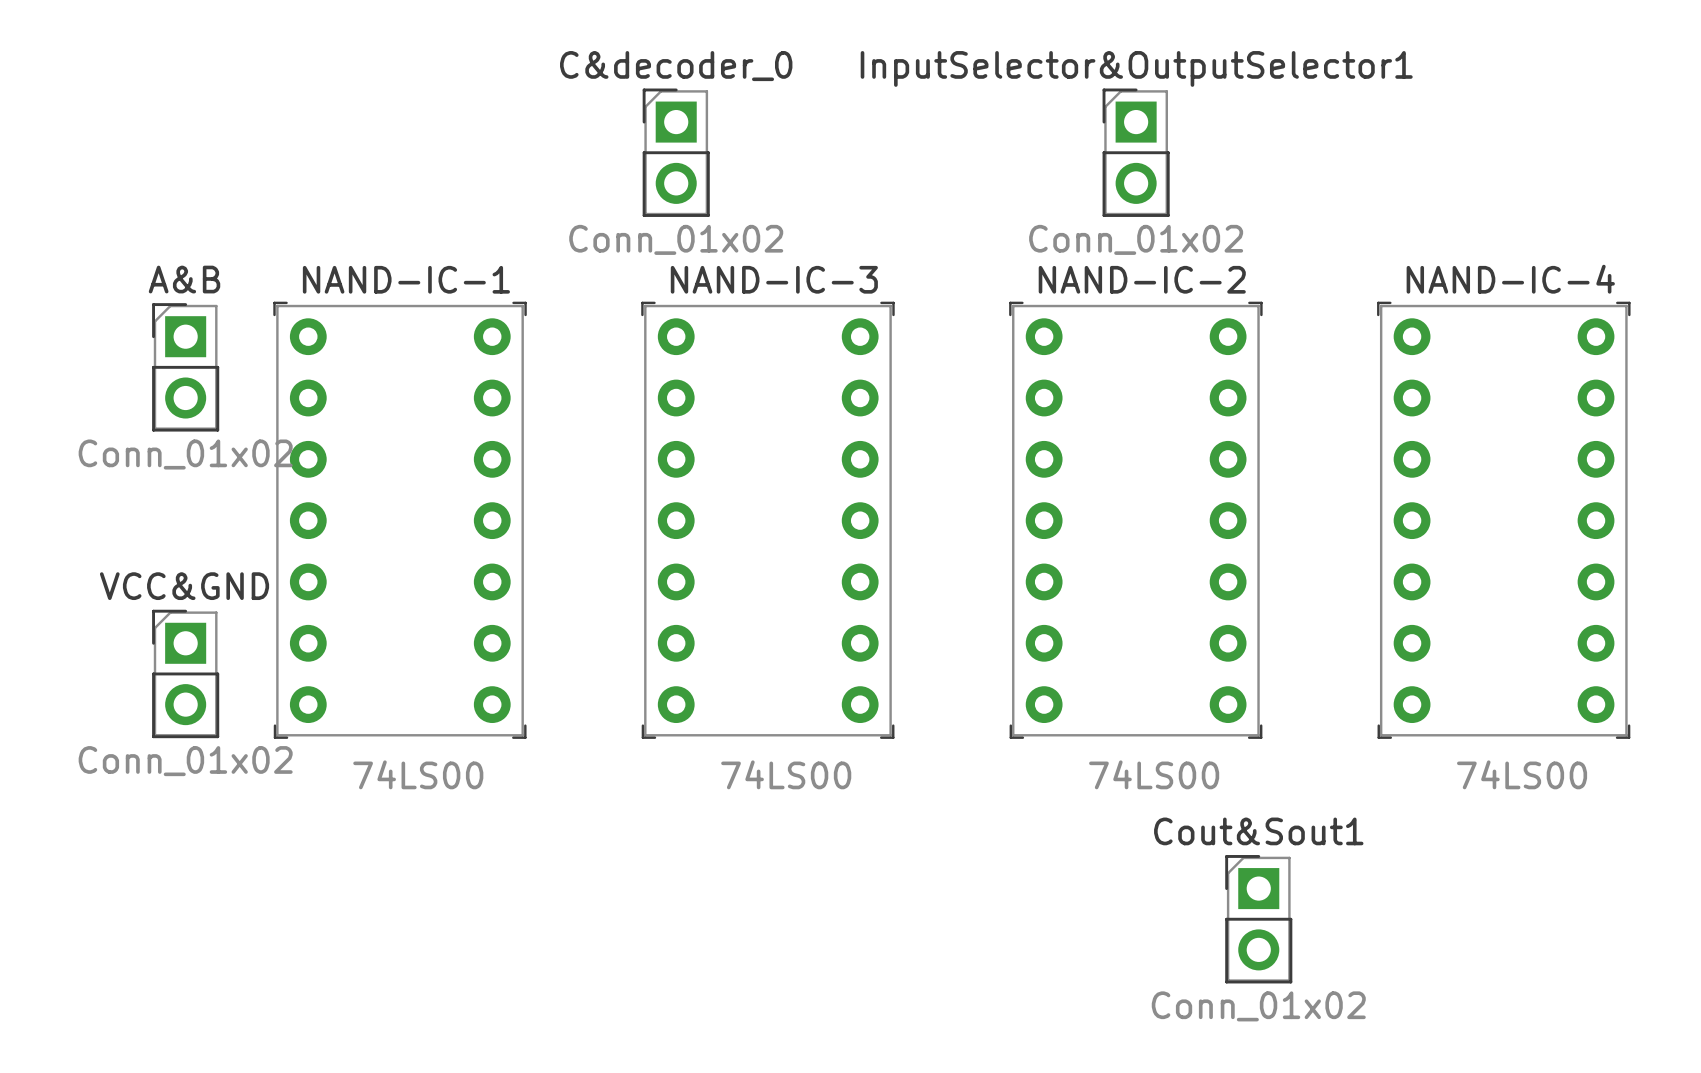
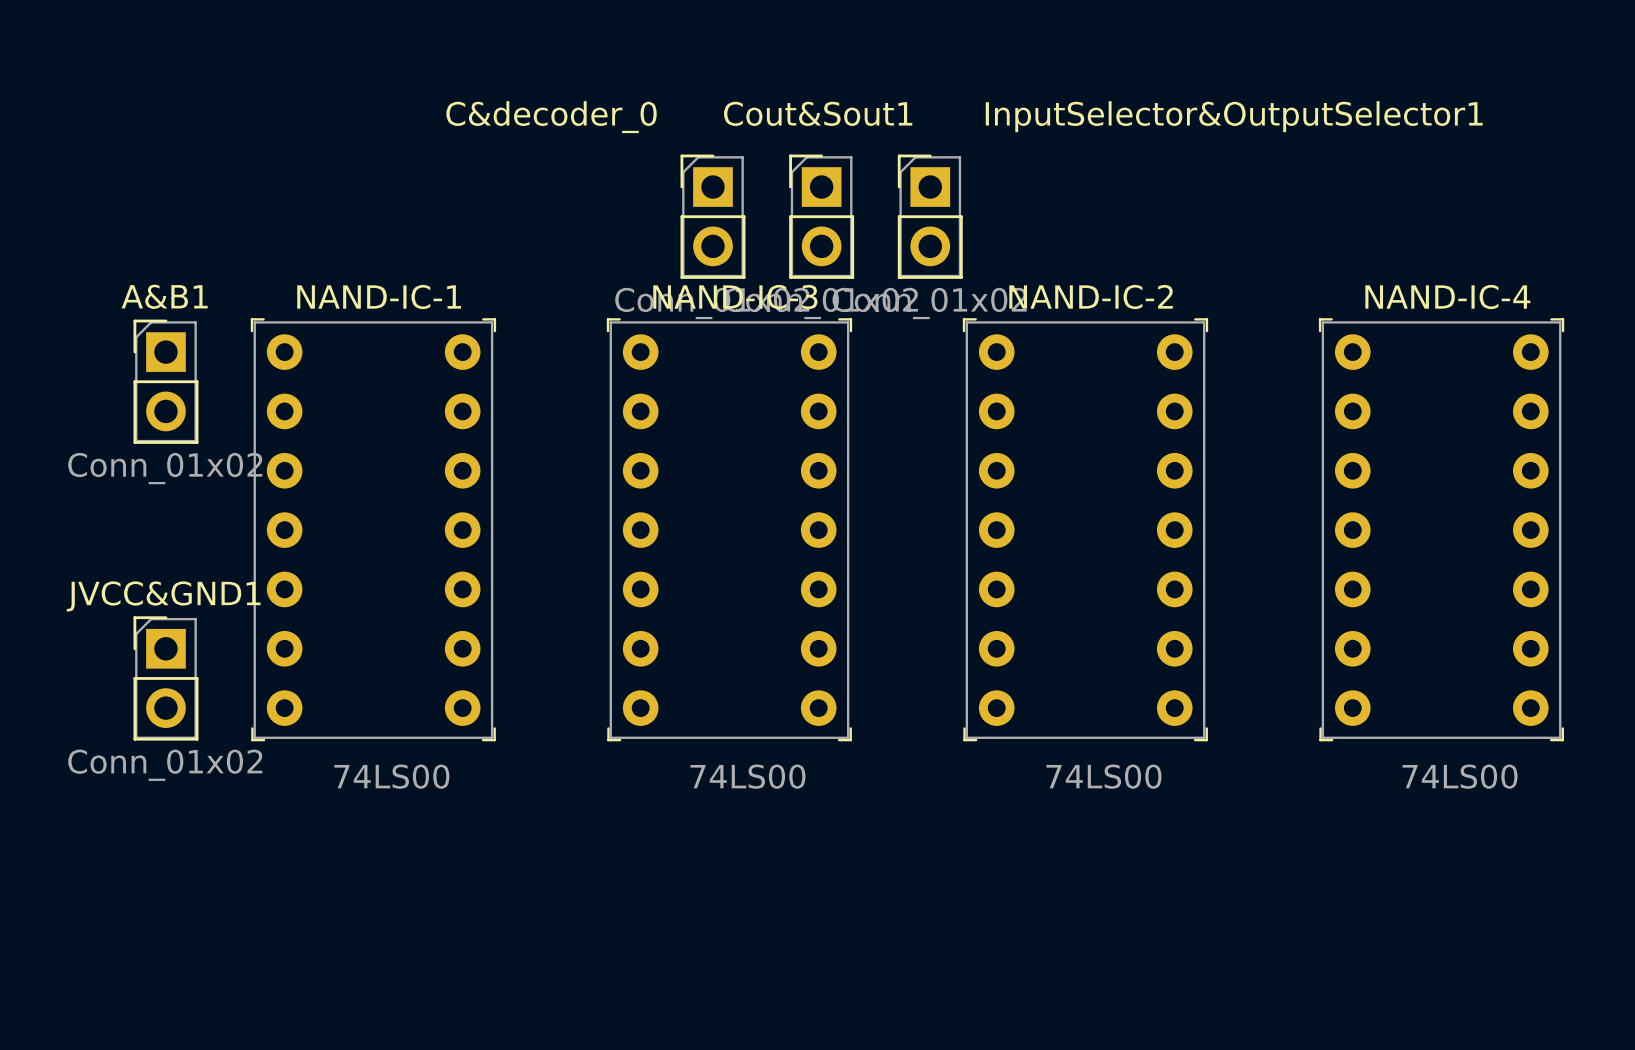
C&decoder_0 name position: C&decoder_0 (676, 66) -> C&decoder_0 (551, 117)
InputSelector&OutputSelector1 name position: InputSelector&OutputSelector1 (1136, 68) -> InputSelector&OutputSelector1 (1234, 116)
C&decoder_0 position: (676, 152) -> (713, 216)
InputSelector&OutputSelector1 position: (1136, 152) -> (930, 216)
A&B name: A&B (184, 279) -> A&B1 (164, 296)
VCC&GND name: VCC&GND (184, 586) -> JVCC&GND1 (163, 596)
Cout&Sout1 name position: Cout&Sout1 (1258, 831) -> Cout&Sout1 (818, 113)
Cout&Sout1 position: (1258, 919) -> (821, 216)

